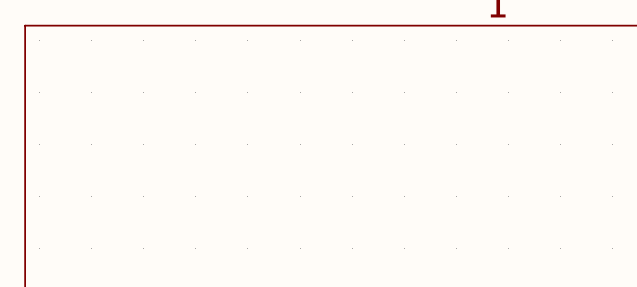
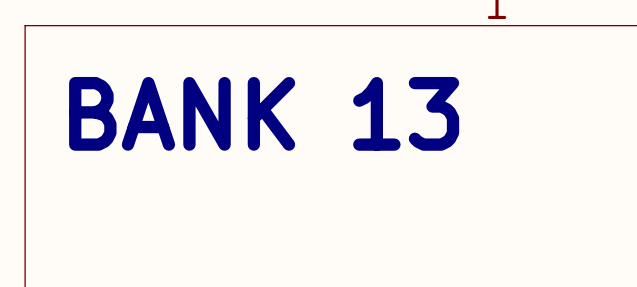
text: none -> BANK 13 (264, 113)

